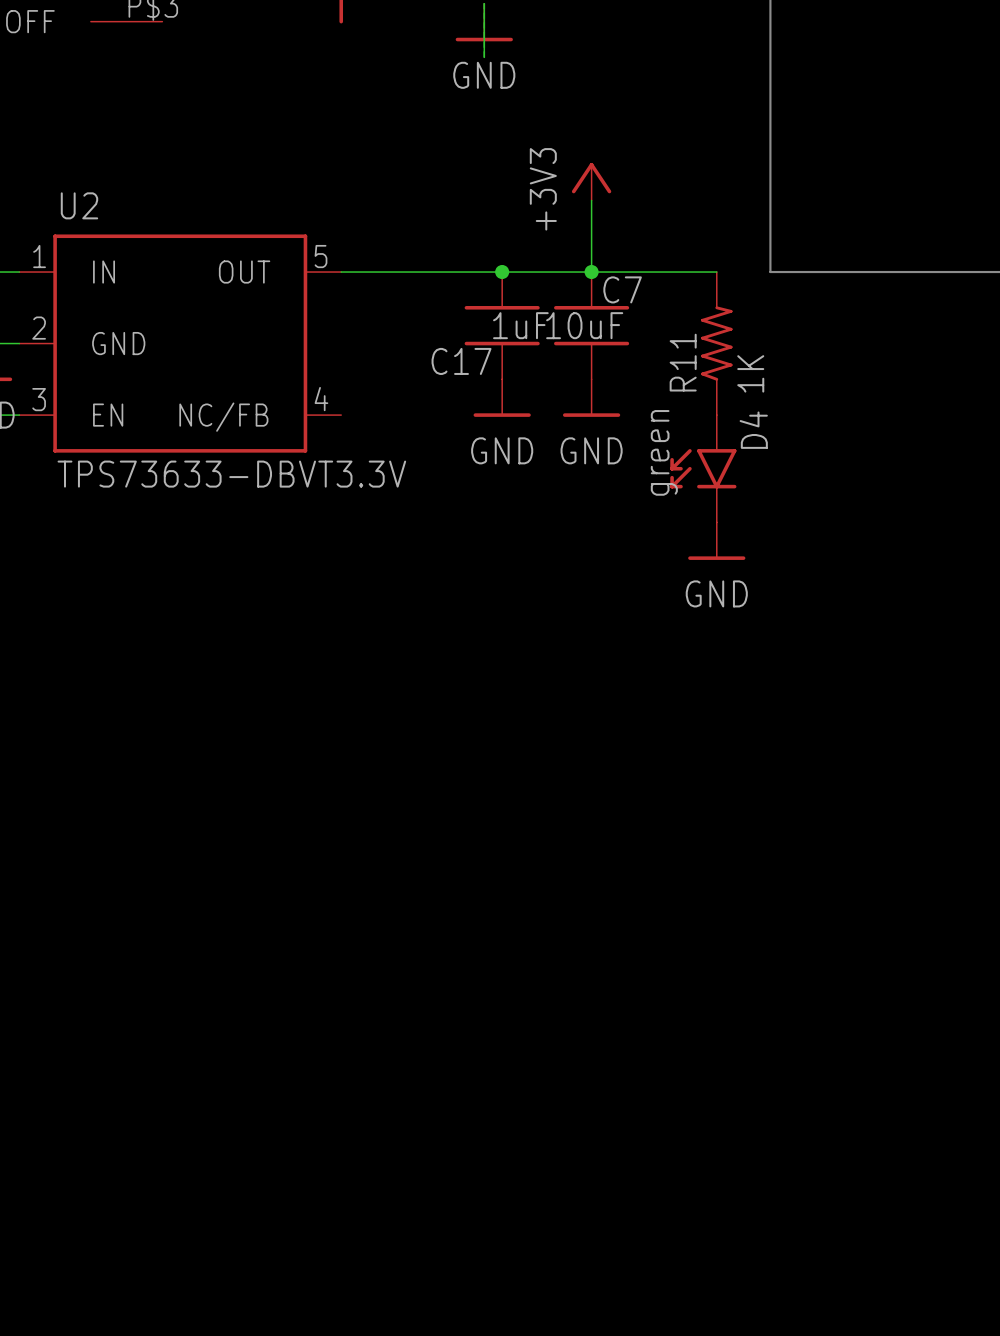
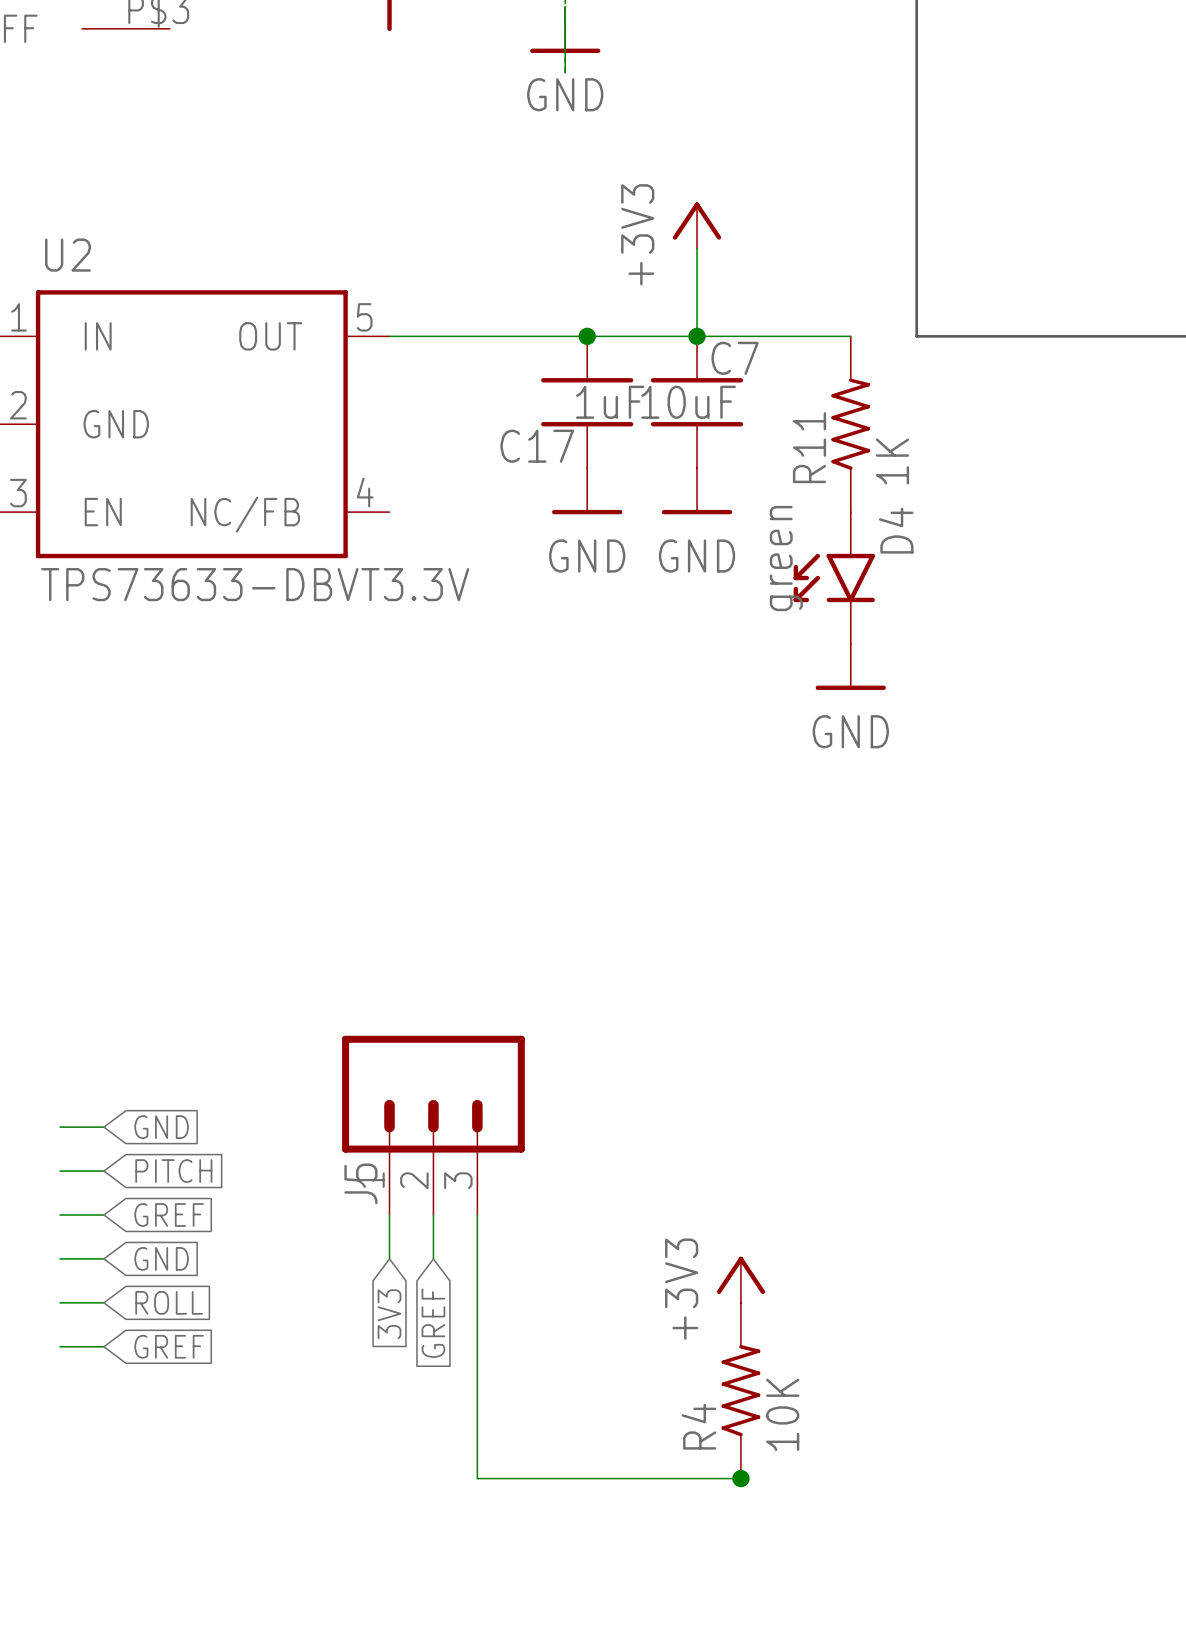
J5: none -> (433, 1125)
wire: none -> (60, 1127) (103, 1127)
global label: none -> GND (161, 1127)
wire: none -> (60, 1171) (103, 1171)
global label: none -> PITCH (173, 1171)
wire: none -> (60, 1214) (103, 1214)
global label: none -> GREF (169, 1214)
wire: none -> (389, 1214) (389, 1258)
wire: none -> (433, 1214) (433, 1258)
wire: none -> (477, 1214) (477, 1478) (740, 1478)
wire: none -> (60, 1258) (103, 1258)
global label: none -> GND (161, 1258)
power symbol: none -> +3V3 (740, 1279)
wire: none -> (60, 1302) (103, 1302)
global label: none -> ROLL (169, 1302)
global label: none -> 3V3 (389, 1314)
global label: none -> GREF (433, 1323)
wire: none -> (60, 1346) (103, 1346)
global label: none -> GREF (169, 1346)
R4: none -> 10K (740, 1390)
junction: none -> (740, 1478)

